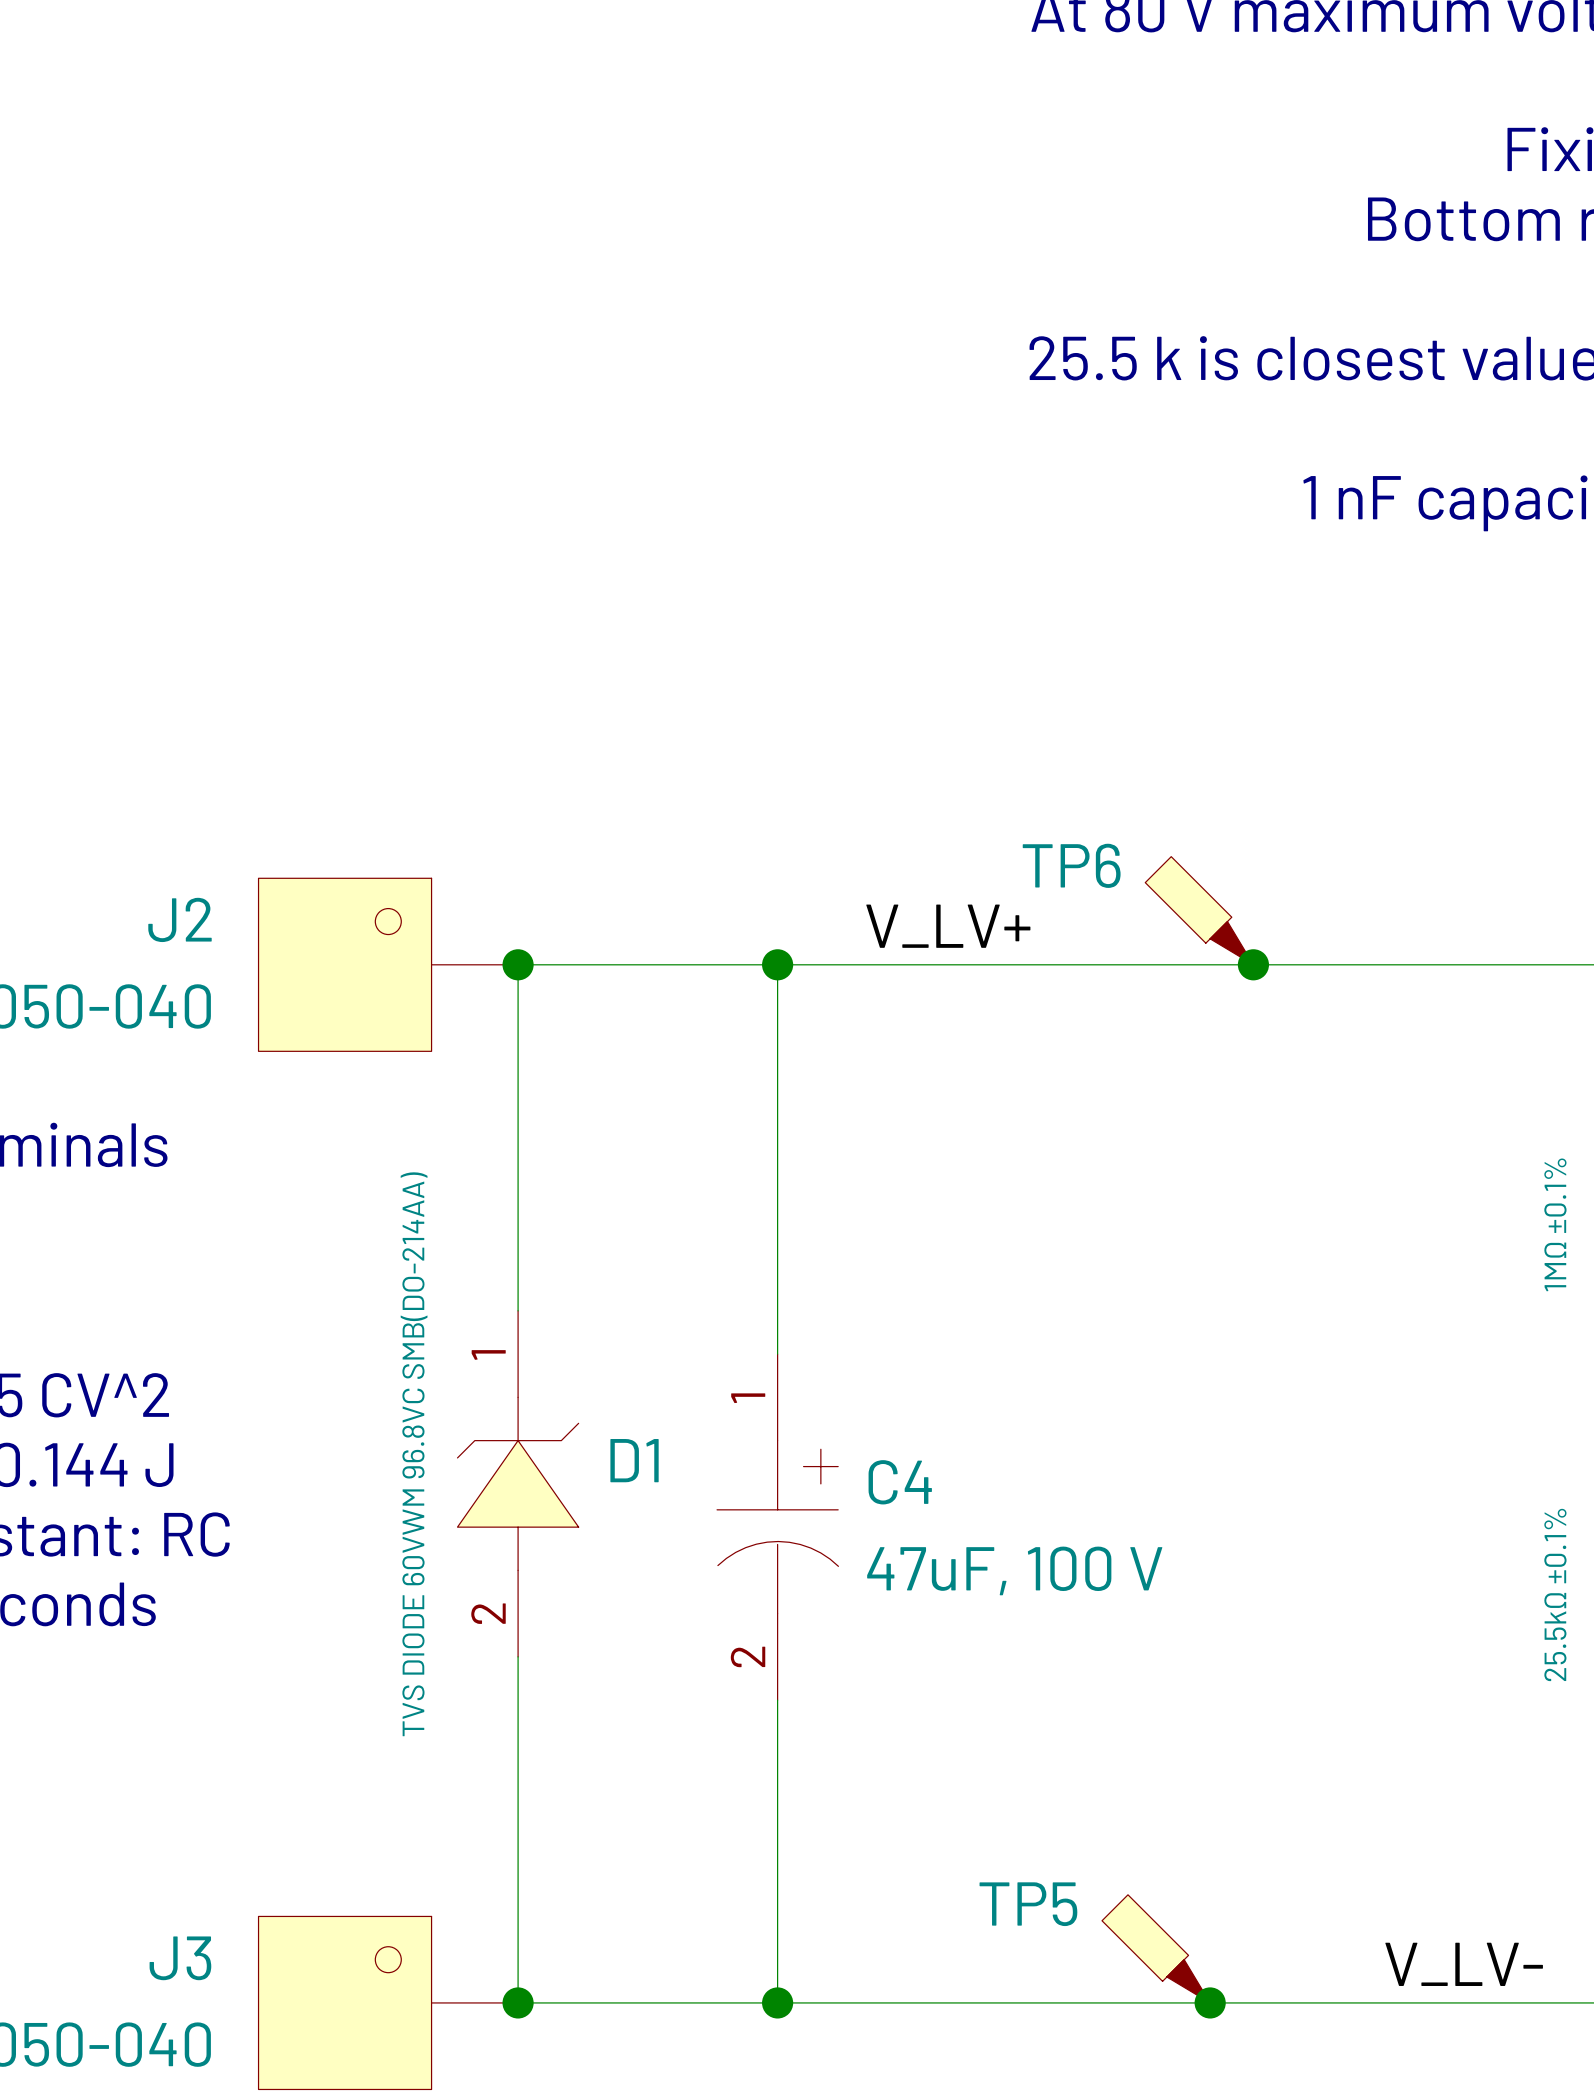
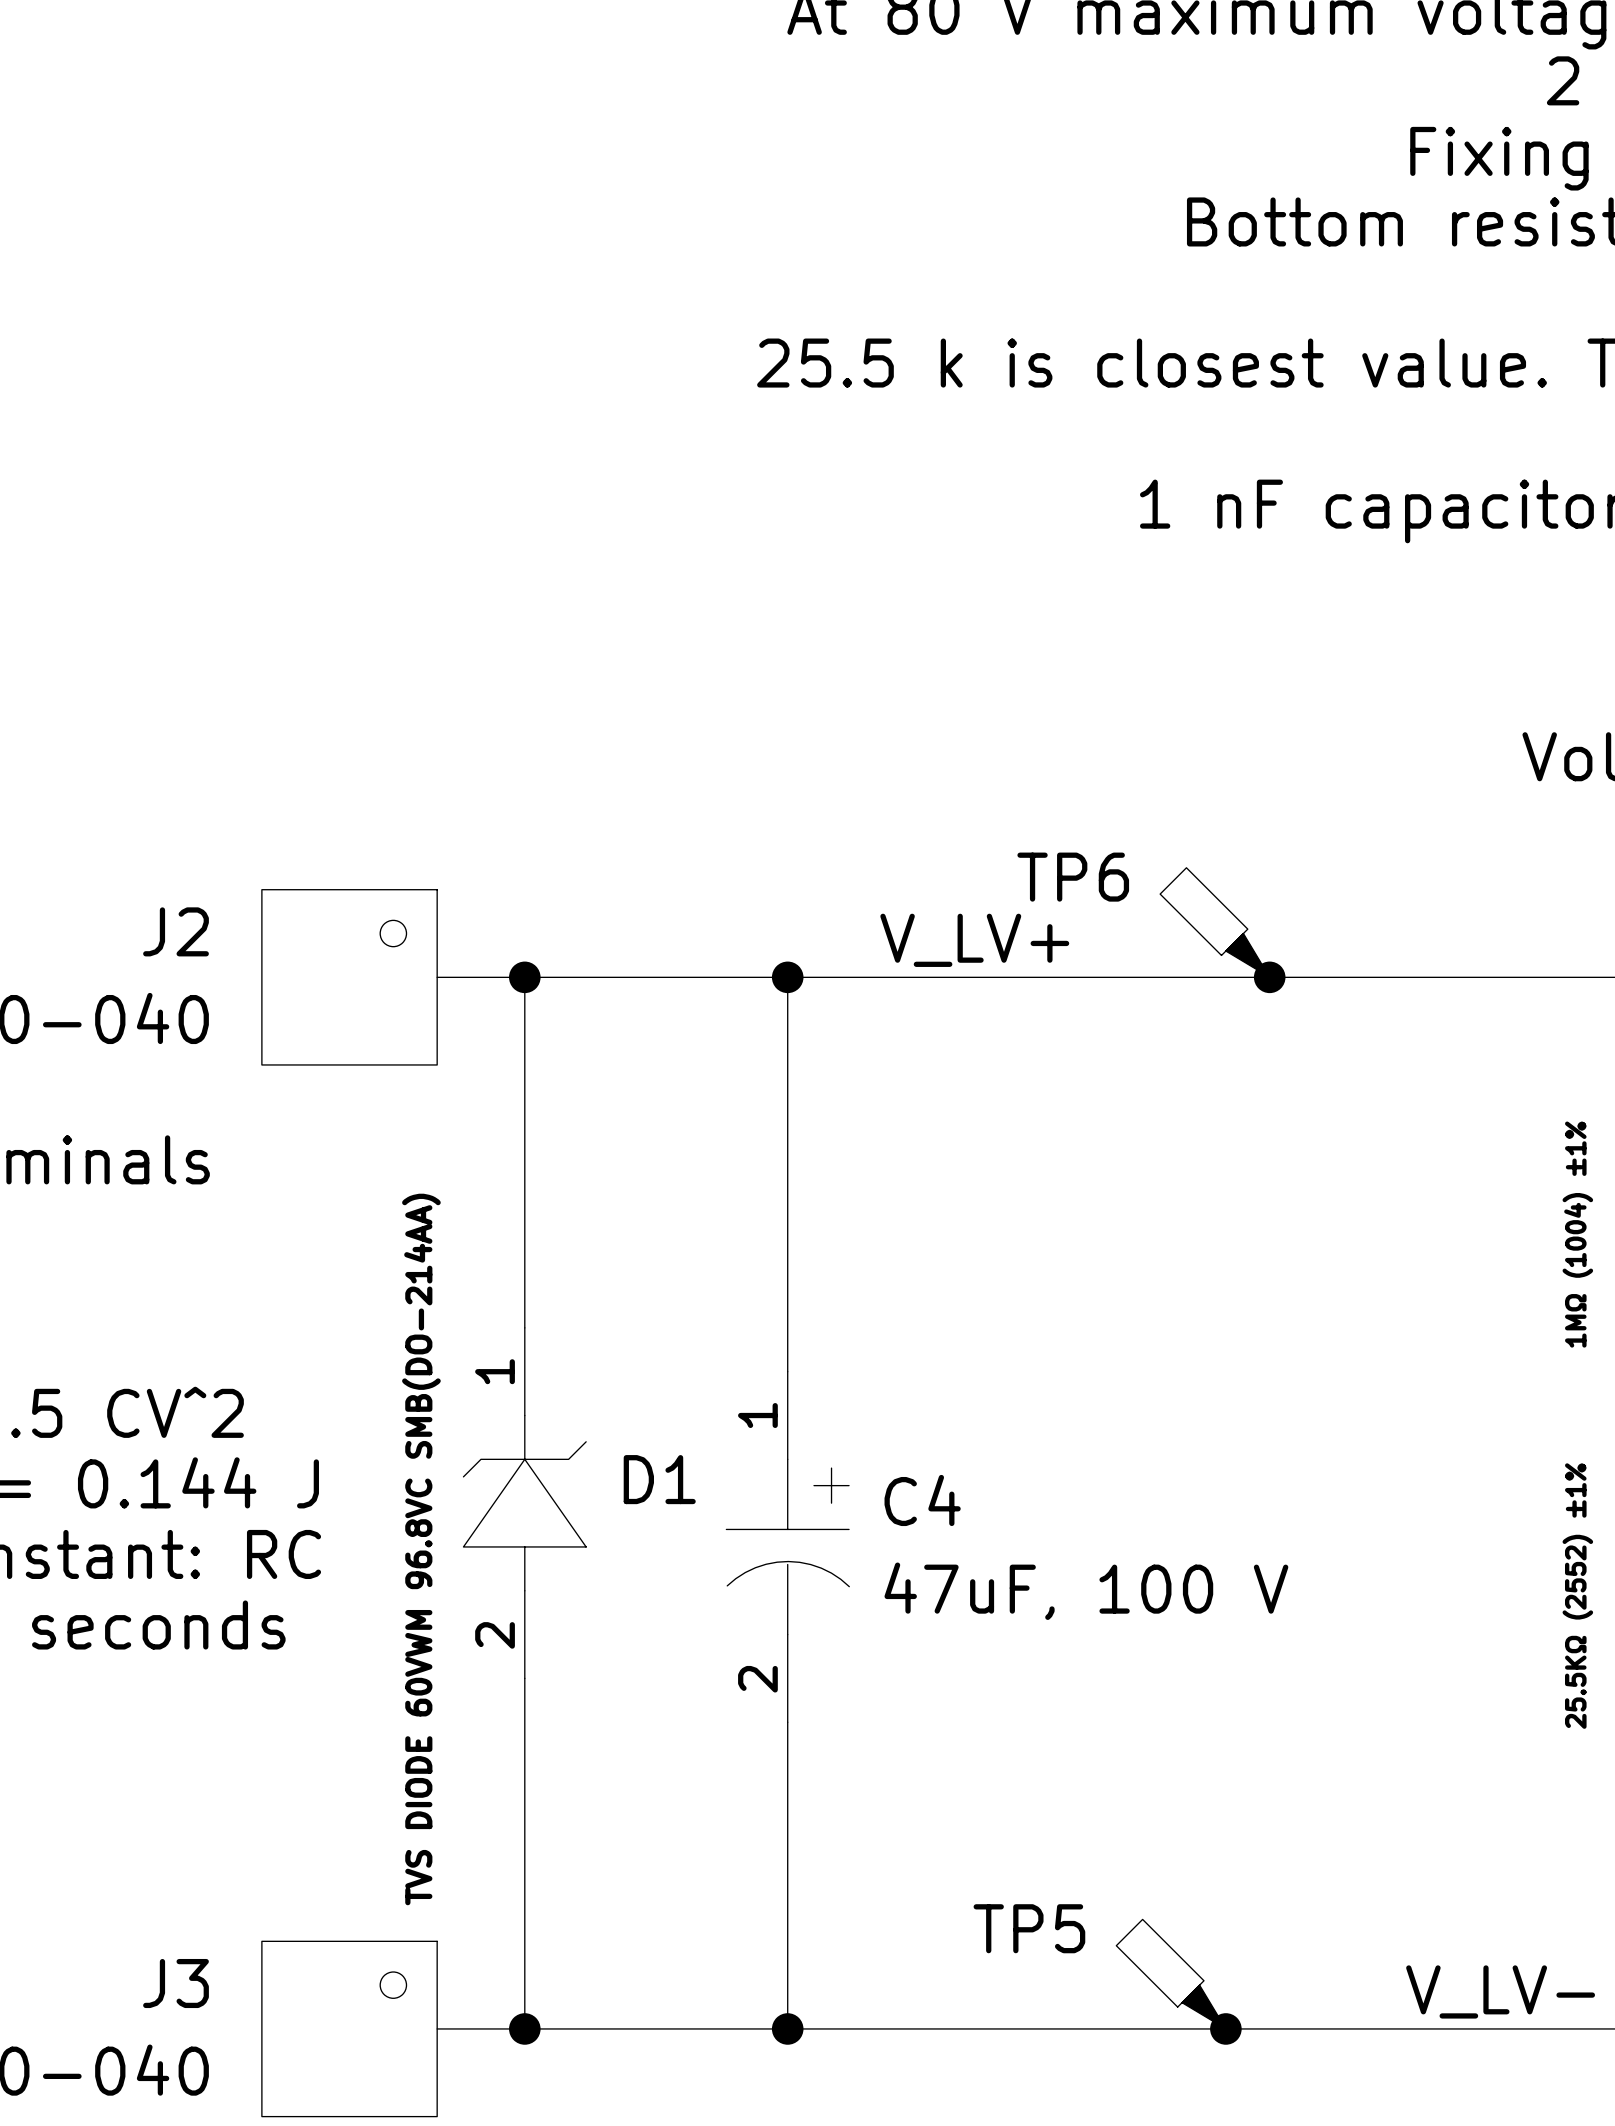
part value: 1MΩ ±0.1% (1555, 1224) -> 1MΩ (1004) ±1% (1577, 1234)
part value: 25.5kΩ ±0.1% (1555, 1594) -> 25.5KΩ (2552) ±1% (1577, 1596)

